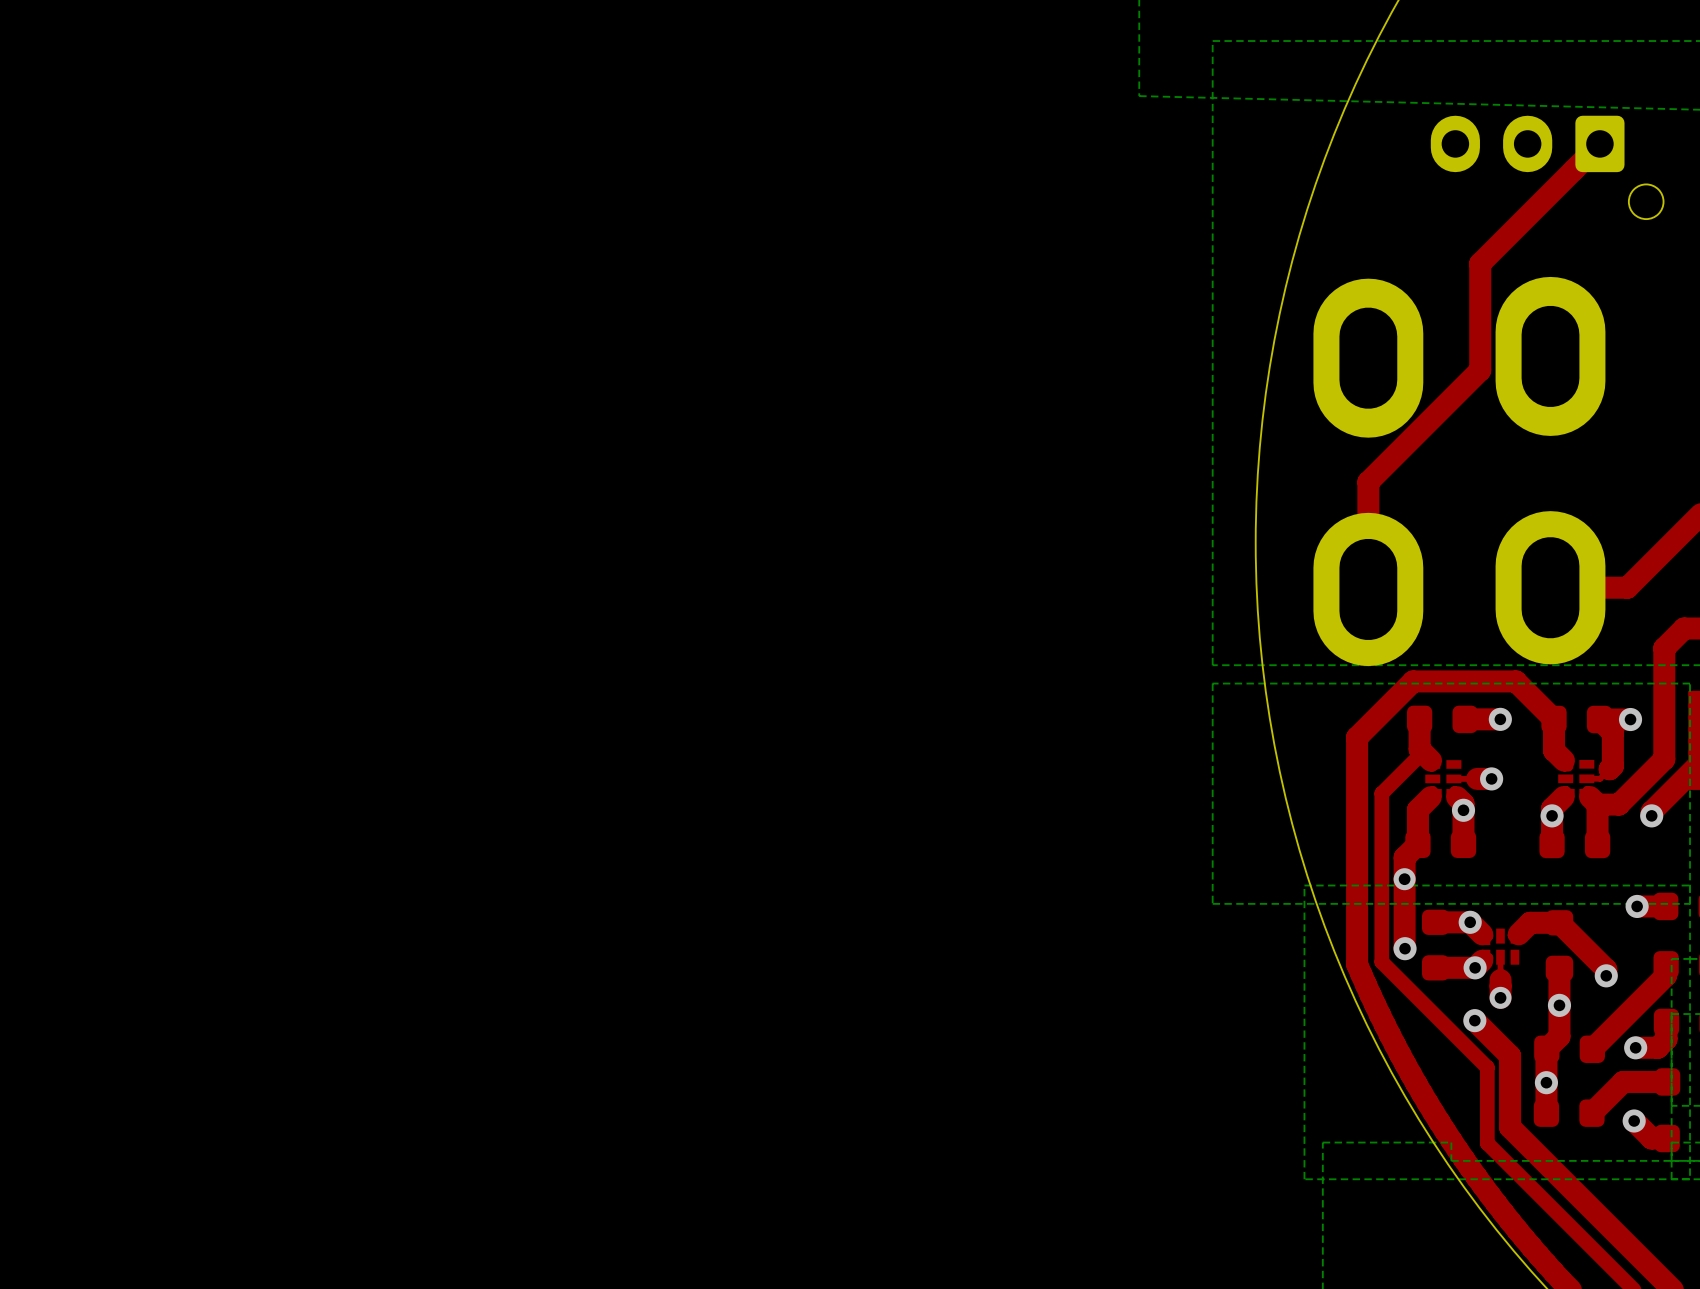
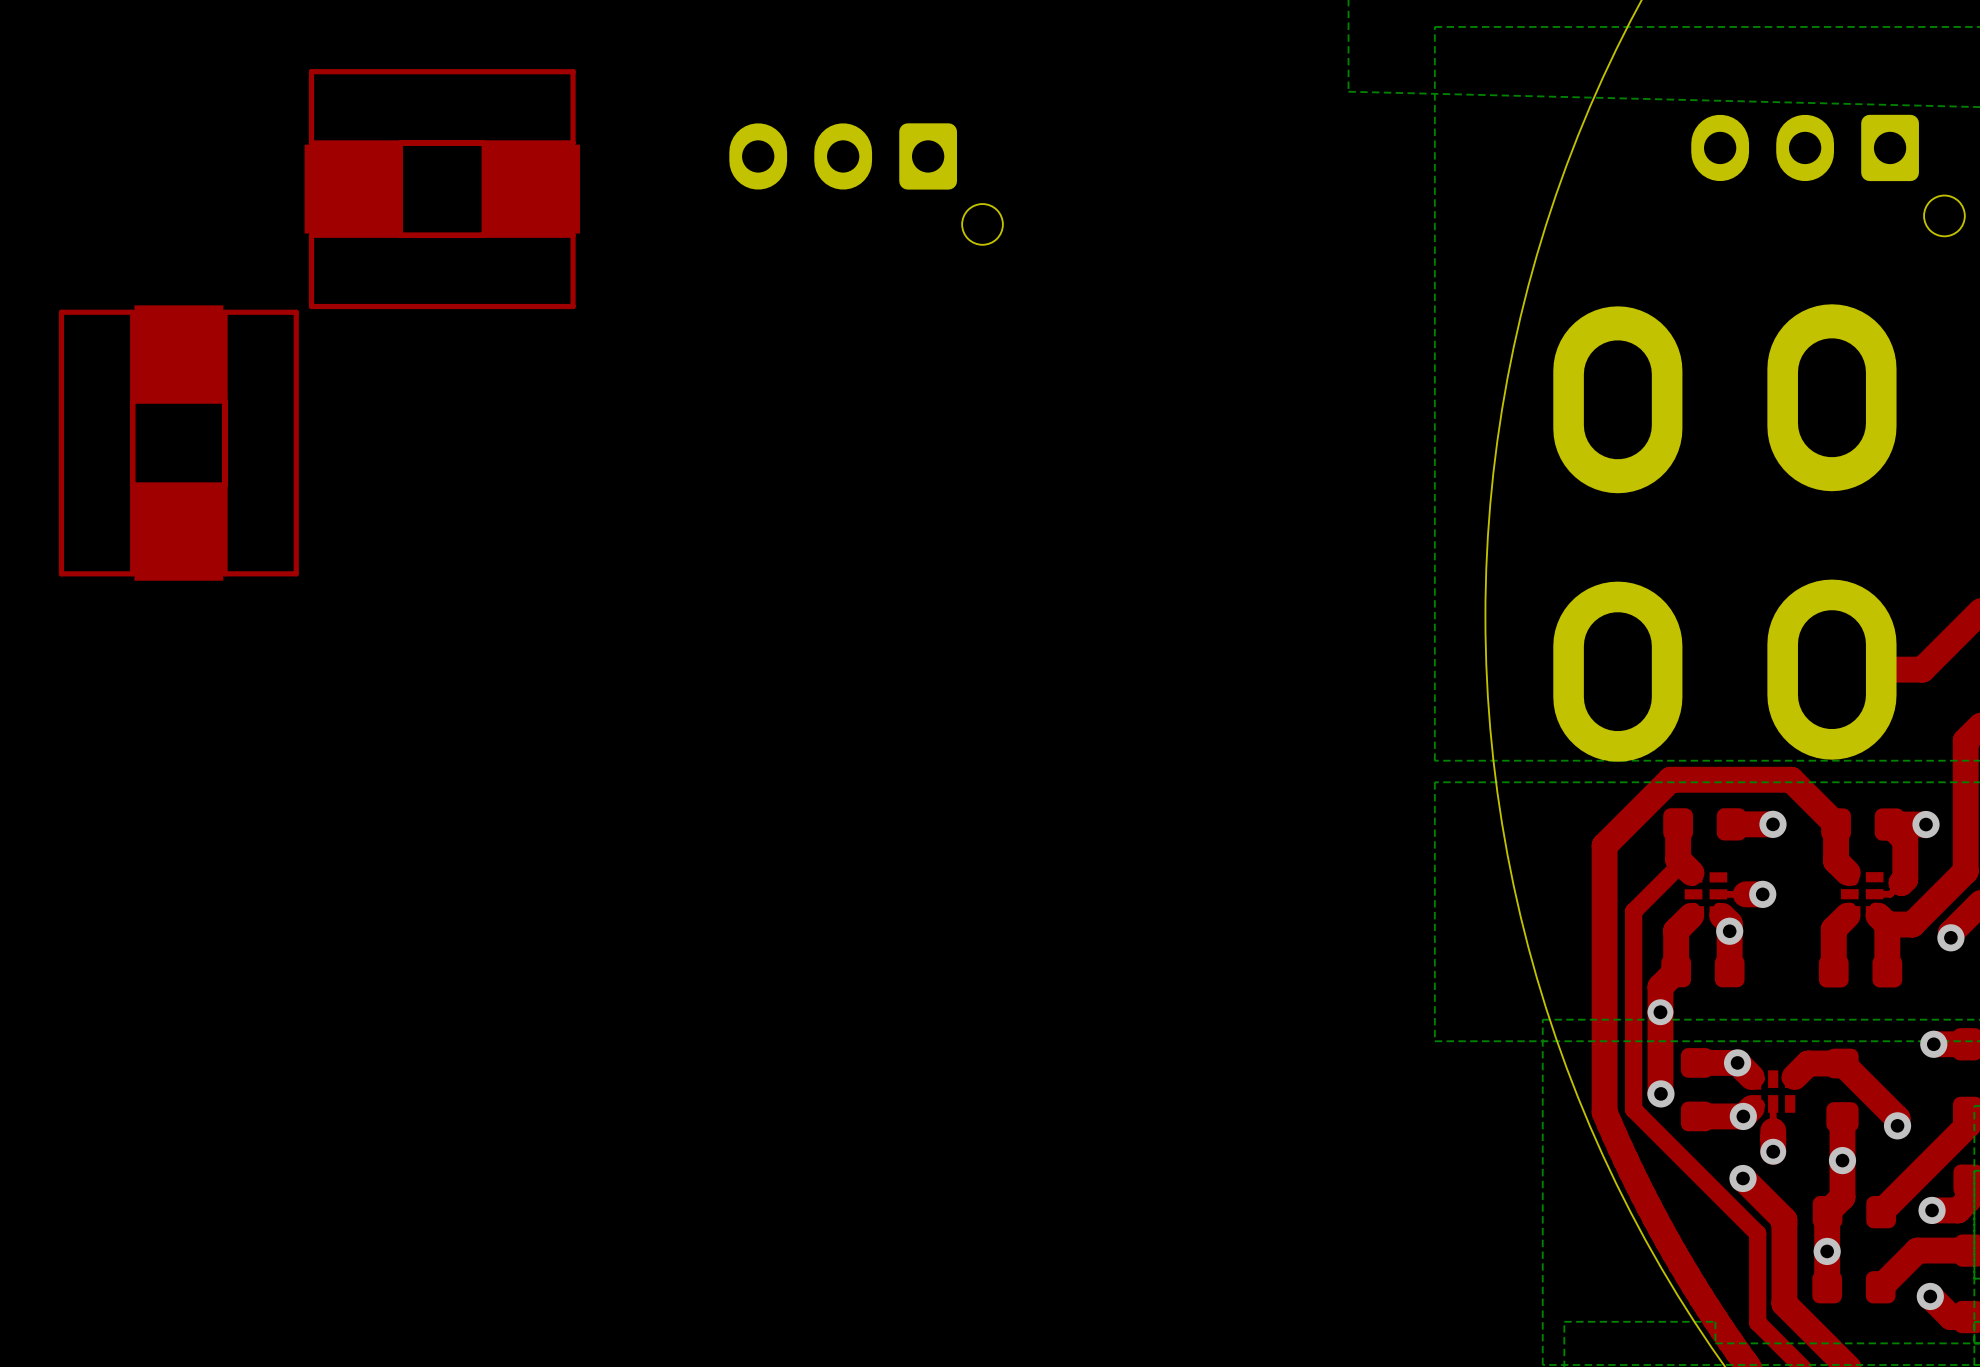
top track: (1599, 143) (1480, 263) (1480, 370) (1368, 482) (1368, 589) -> none
part: none -> (866, 184)
part: none -> (442, 189)
part: none -> (178, 443)
via: (1552, 815) -> none

